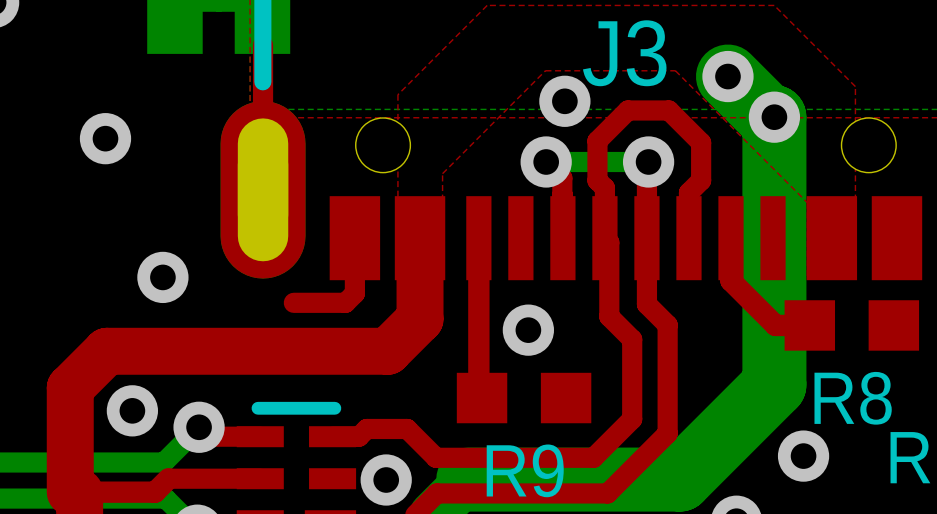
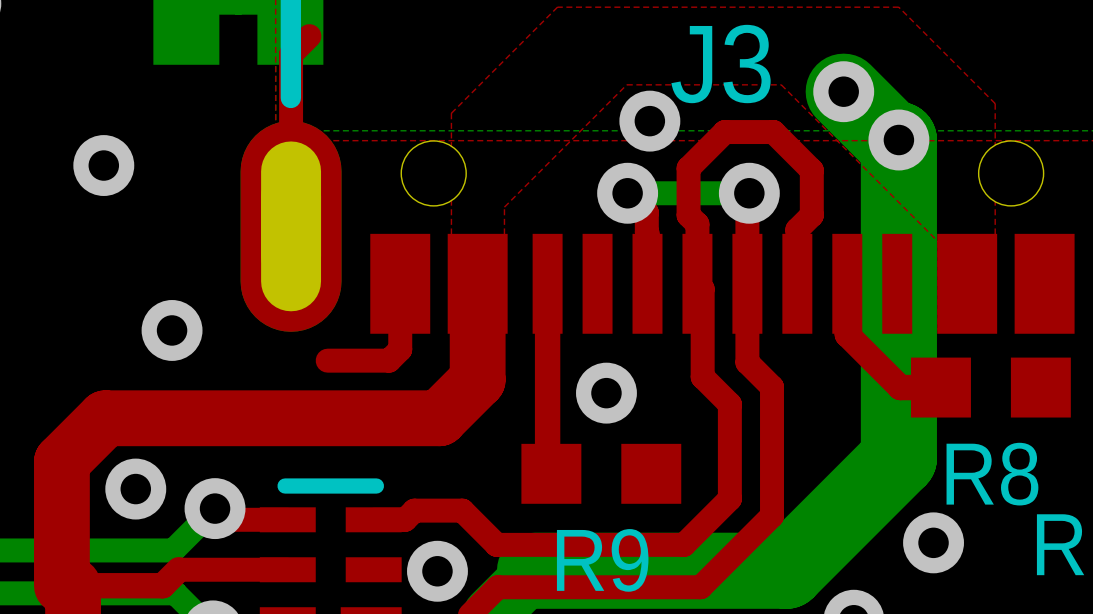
top track: none -> (309, 36) (291, 54)

